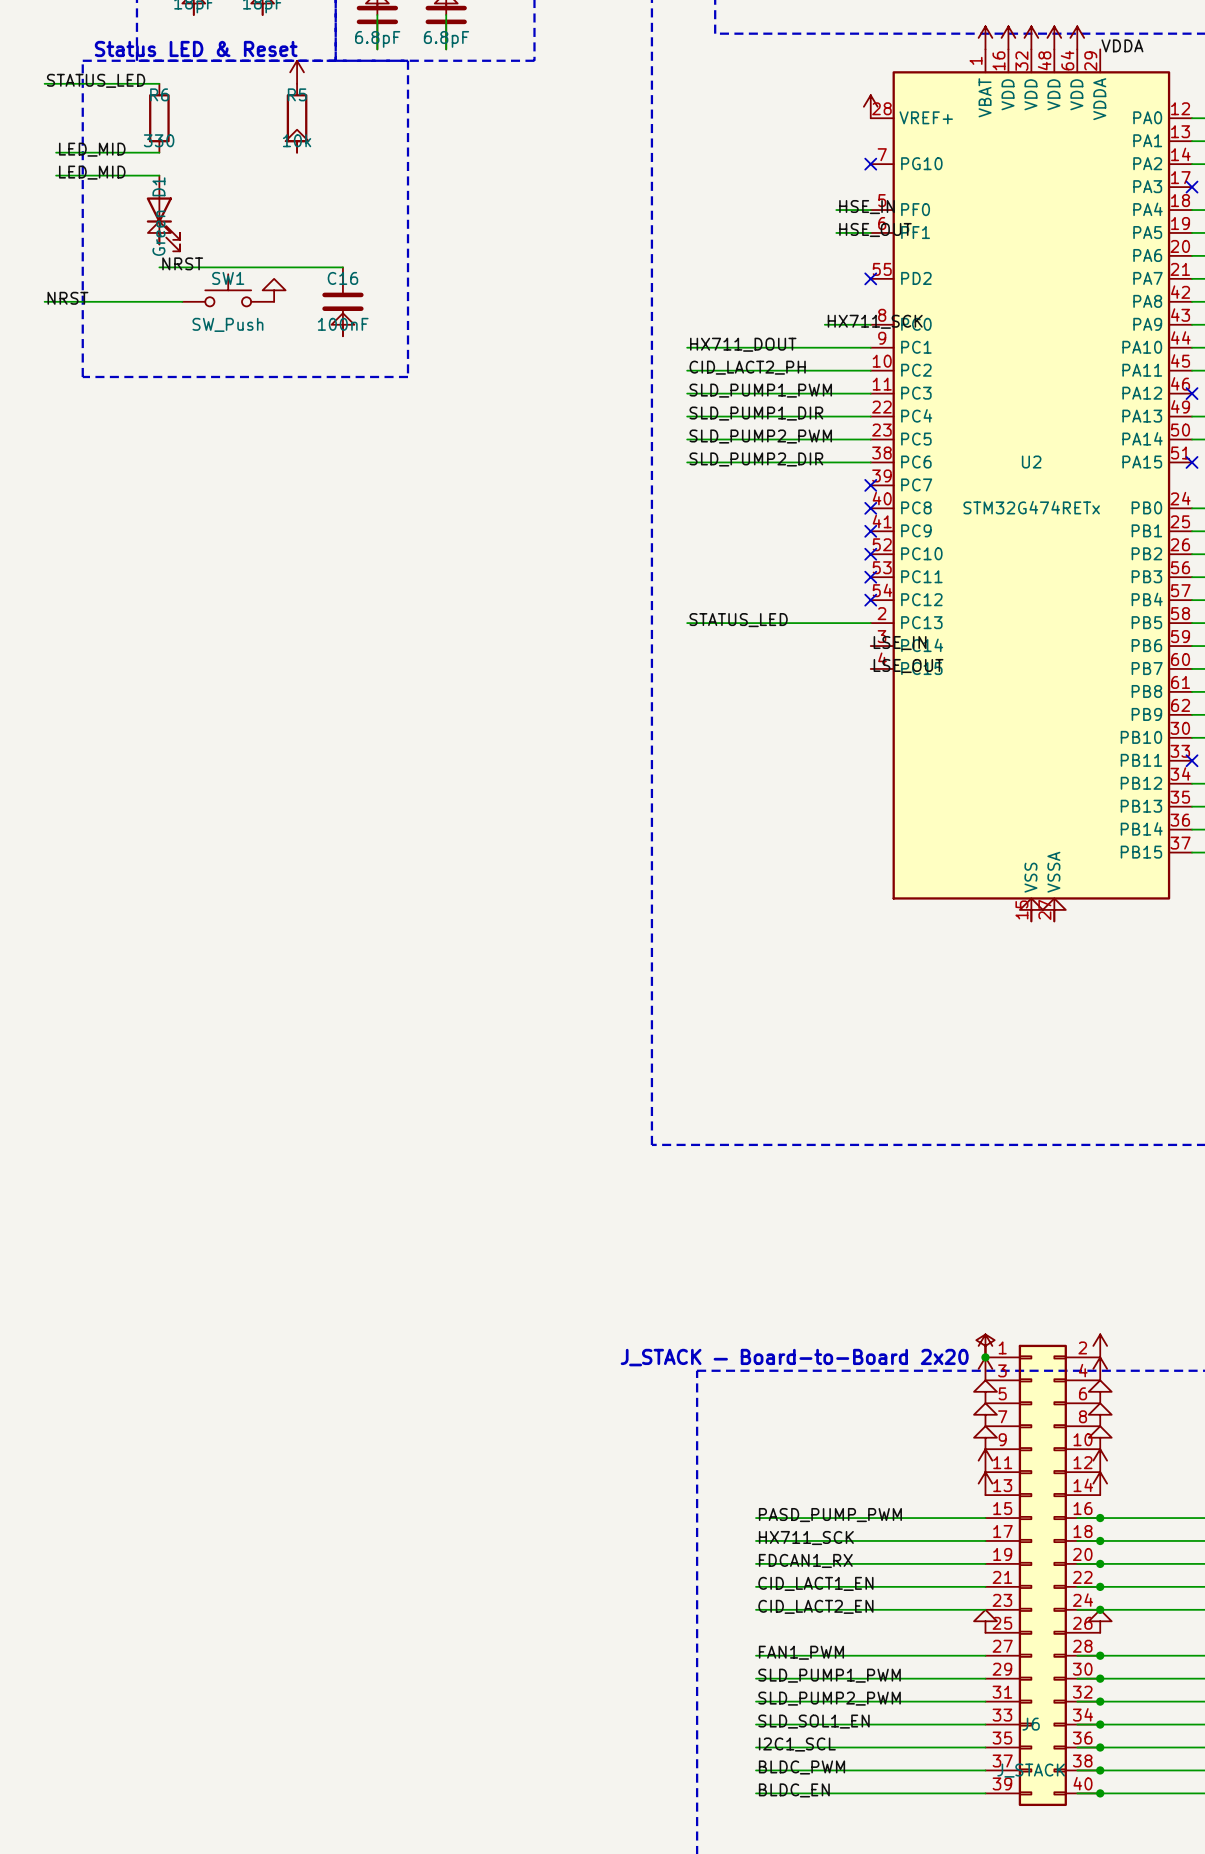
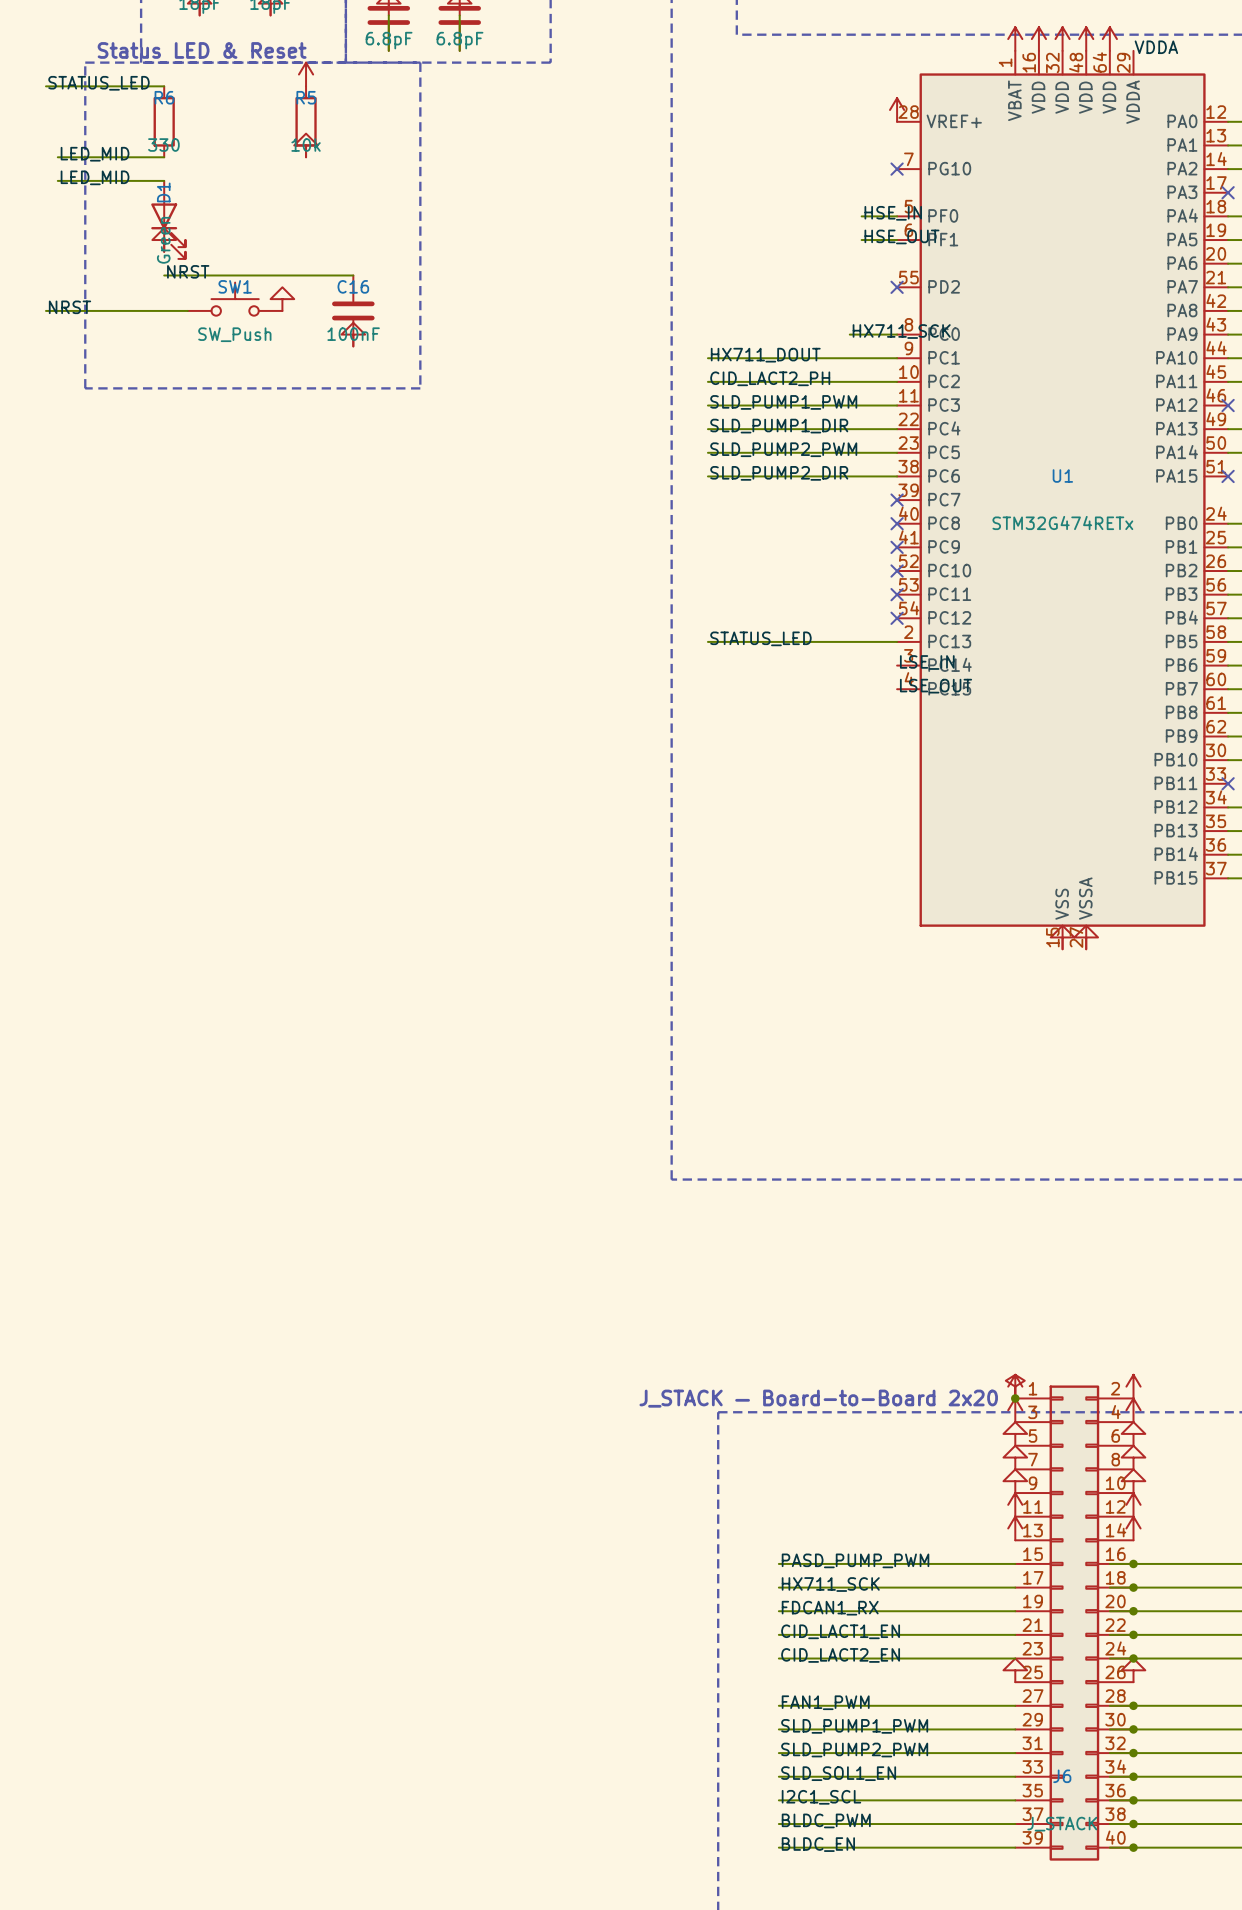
U2 name: U2 (1031, 462) -> U1 (1062, 475)

